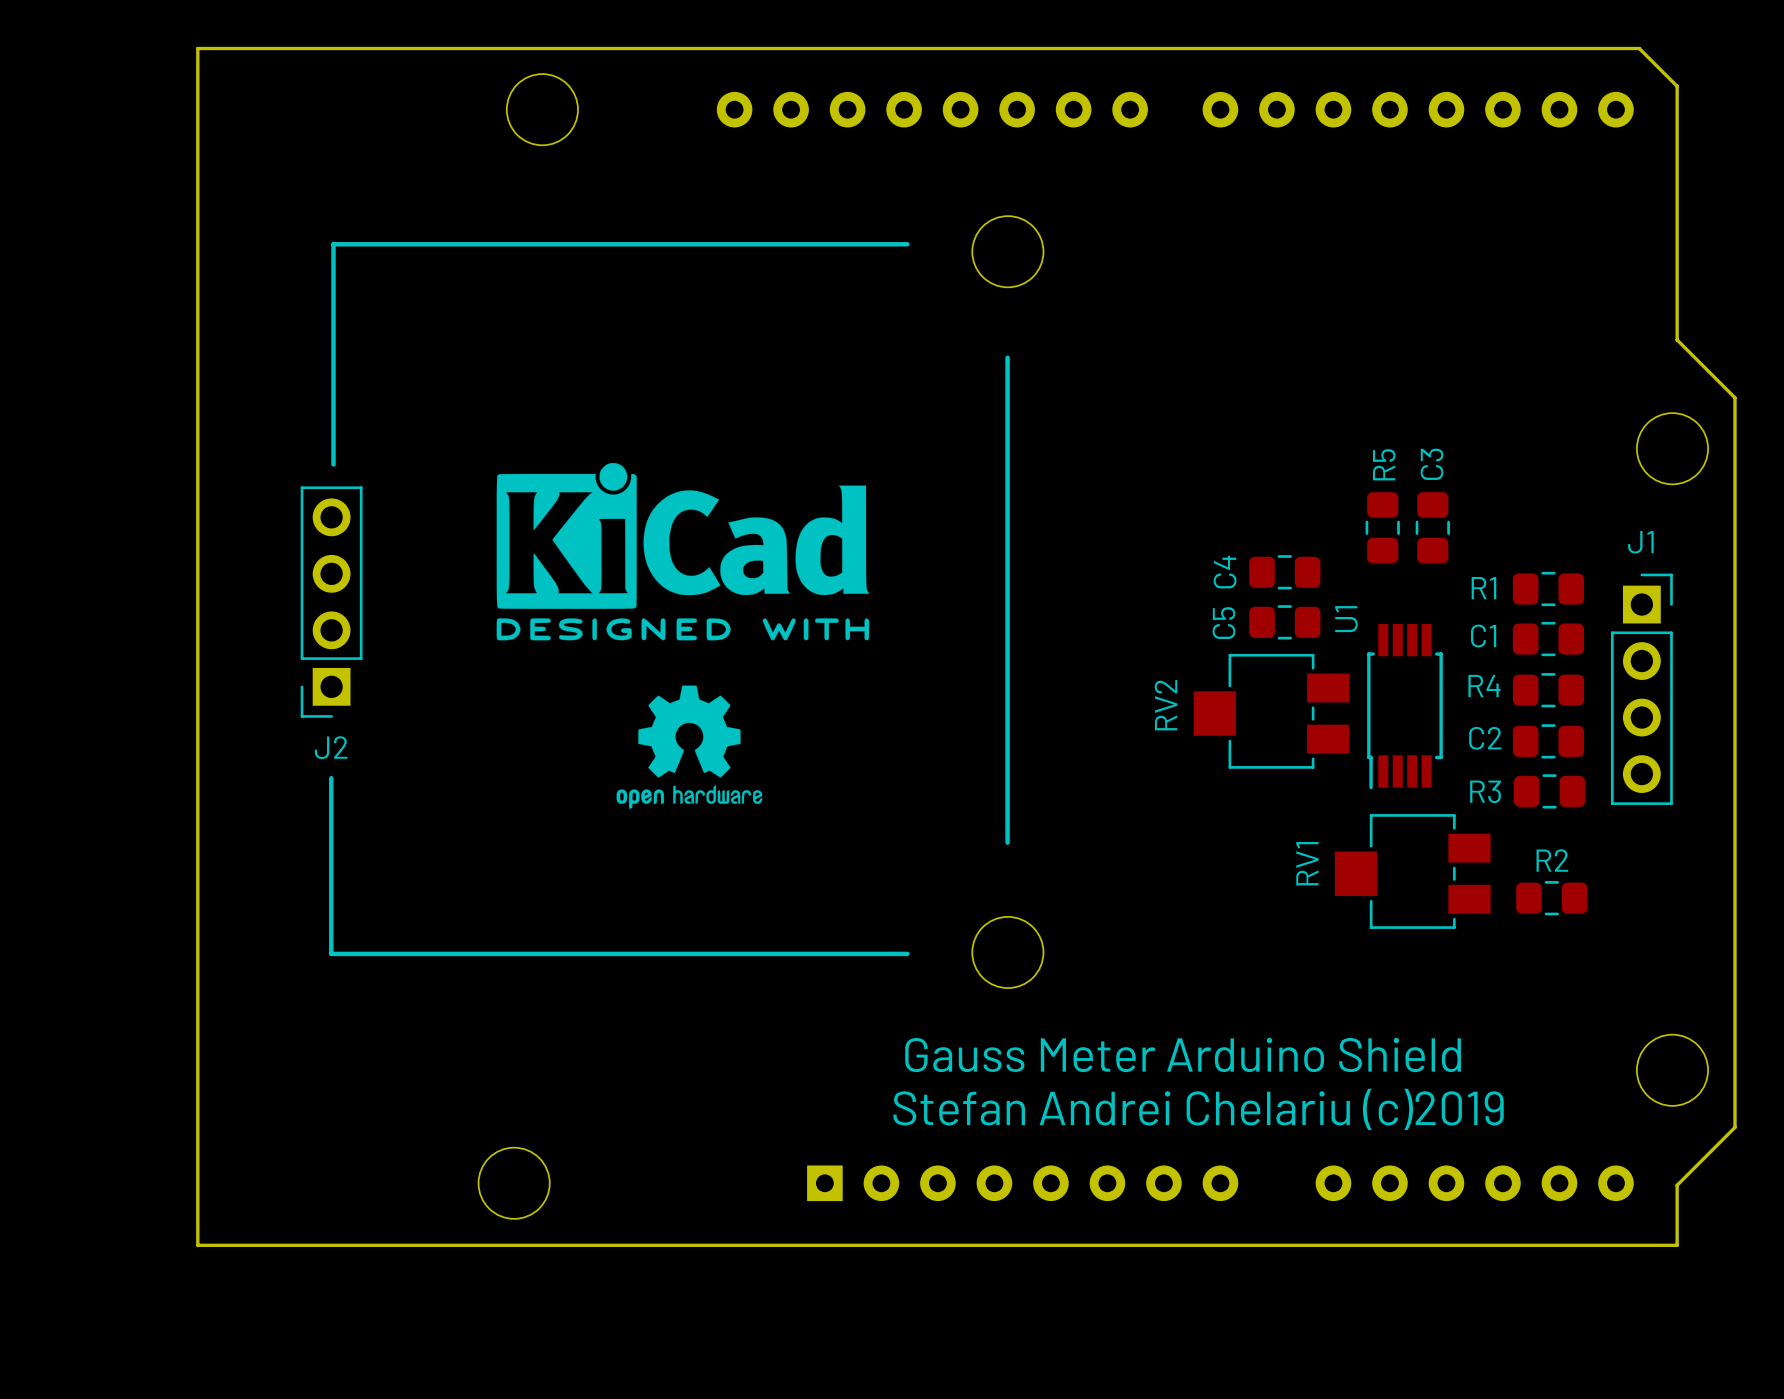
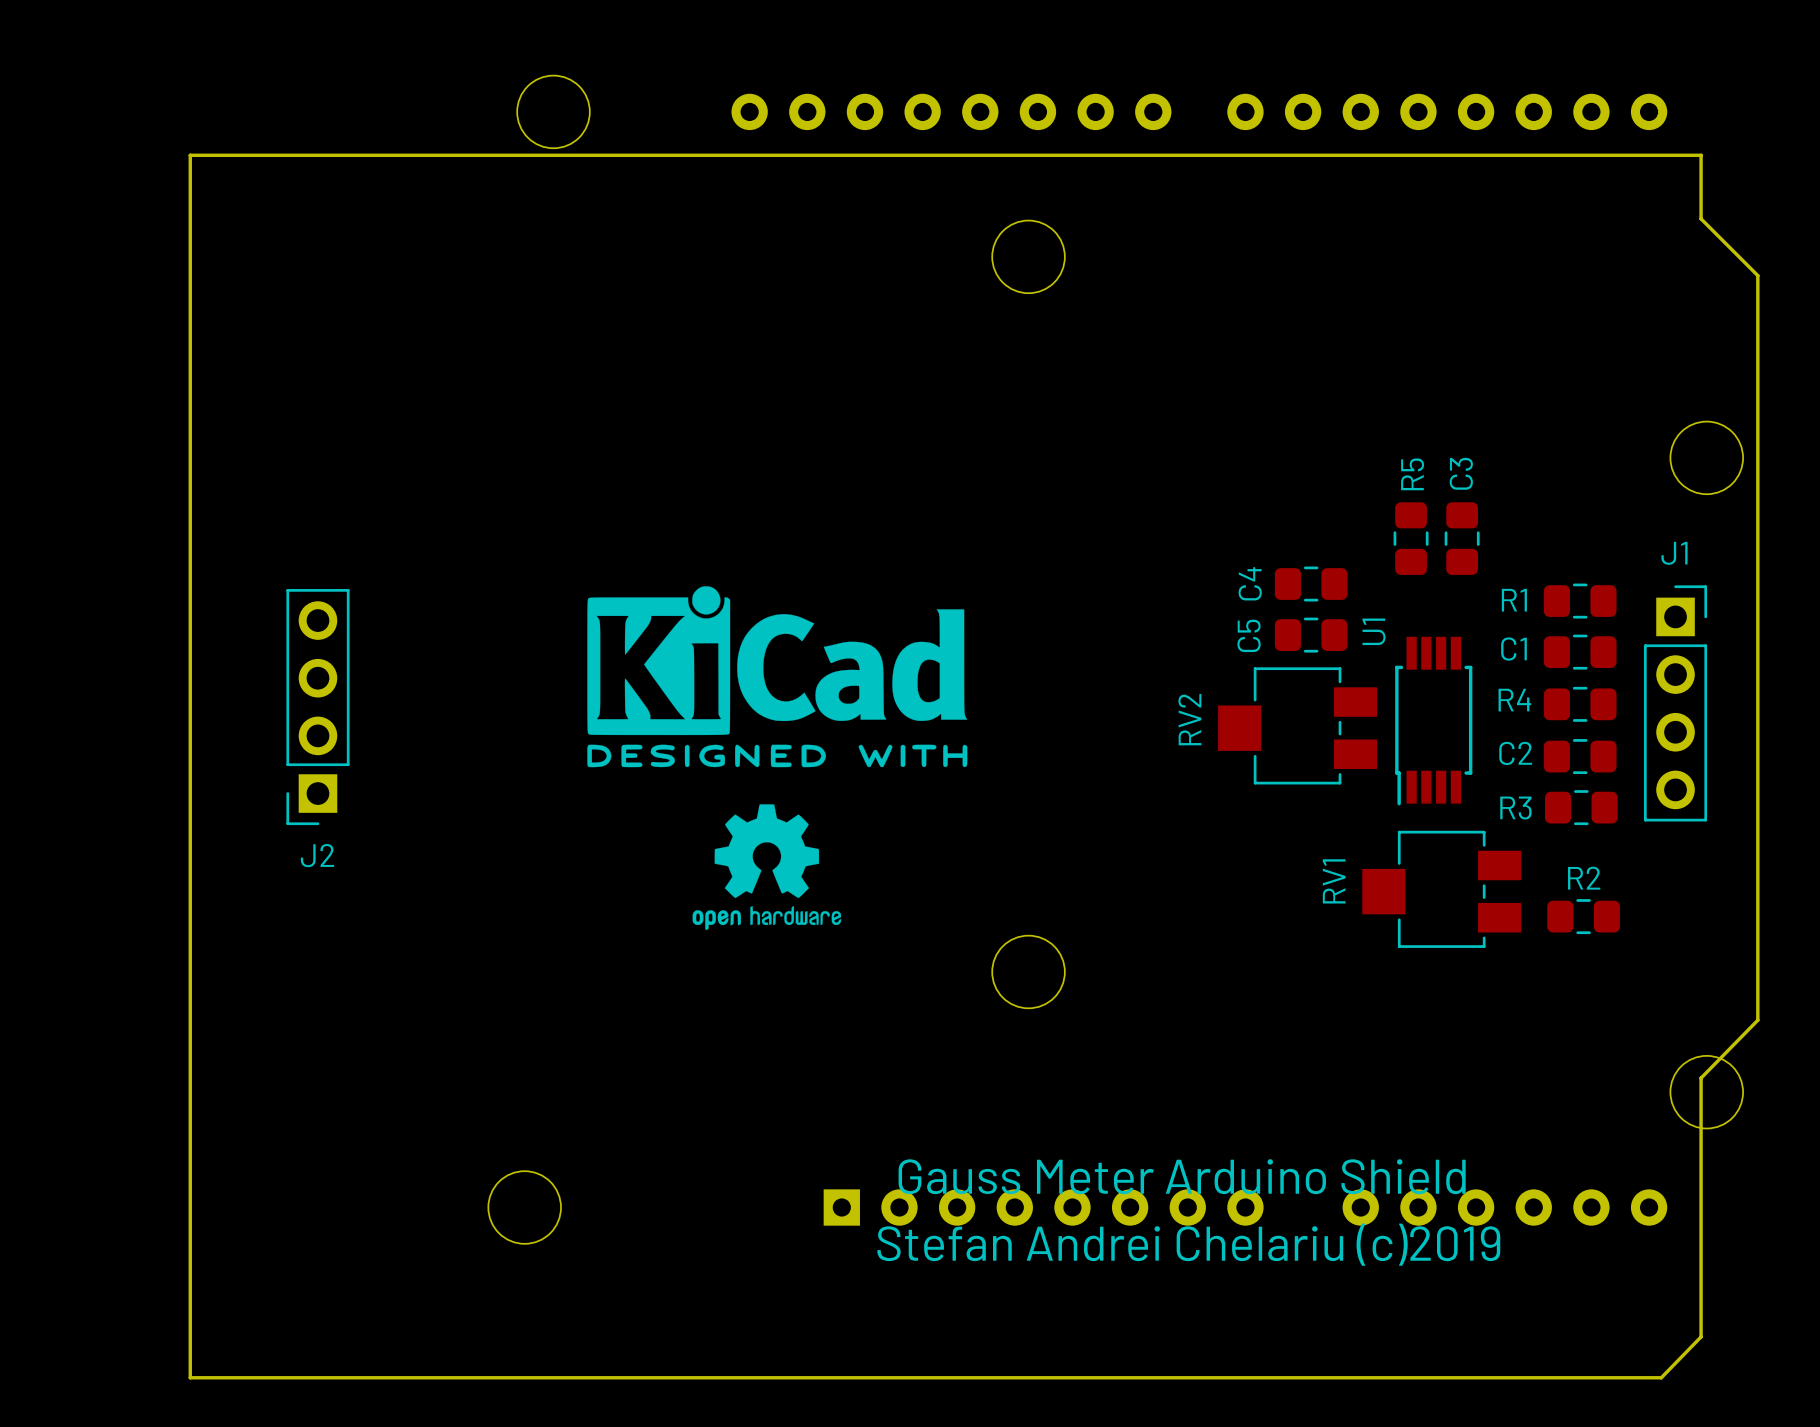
board edge: (197, 48) (1639, 48) (1677, 86) (1677, 339) (1734, 397) (1734, 1127) (1677, 1185) (1677, 1245) (197, 1245) (197, 48) -> (190, 155) (190, 1377) (1661, 1377) (1701, 1336) (1701, 1078) (1757, 1020) (1757, 275) (1701, 218) (1701, 155) (190, 155)
line: (907, 244) (333, 244) (333, 464) -> none
line: (1007, 357) (1007, 842) -> none
drawing position: (682, 551) -> (777, 676)
J2 position: (331, 602) -> (317, 707)
drawing position: (689, 747) -> (766, 867)
line: (331, 778) (331, 953) (907, 953) -> none
text position: Gauss Meter Arduino Shield (1183, 1054) -> Gauss Meter Arduino Shield (1182, 1176)
text position: Stefan Andrei Chelariu (c)2019 (1198, 1109) -> Stefan Andrei Chelariu (c)2019 (1188, 1244)

